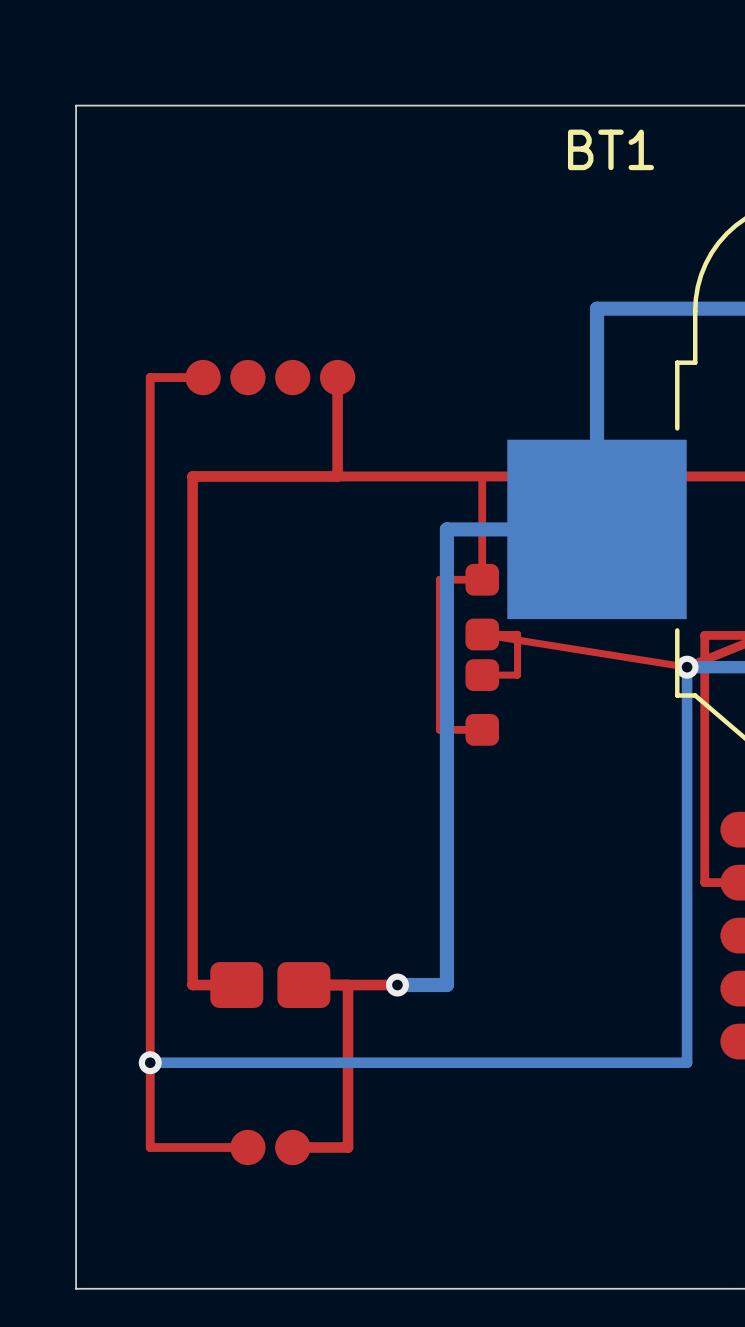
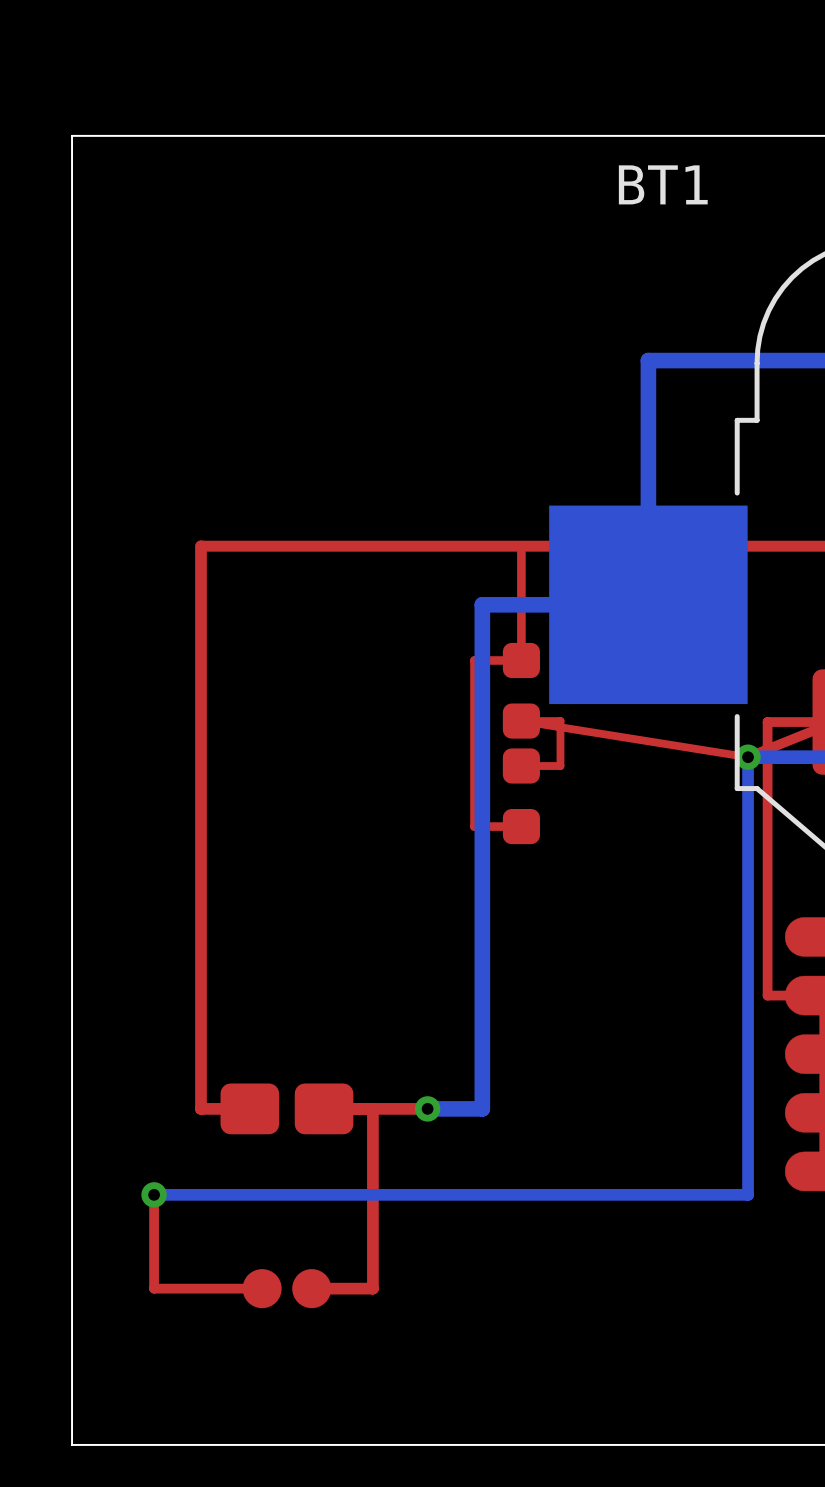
top track: (203, 377) (150, 377) (150, 1062) -> none
part: (270, 377) -> none
top track: (337, 377) (337, 476) (192, 476) -> none

